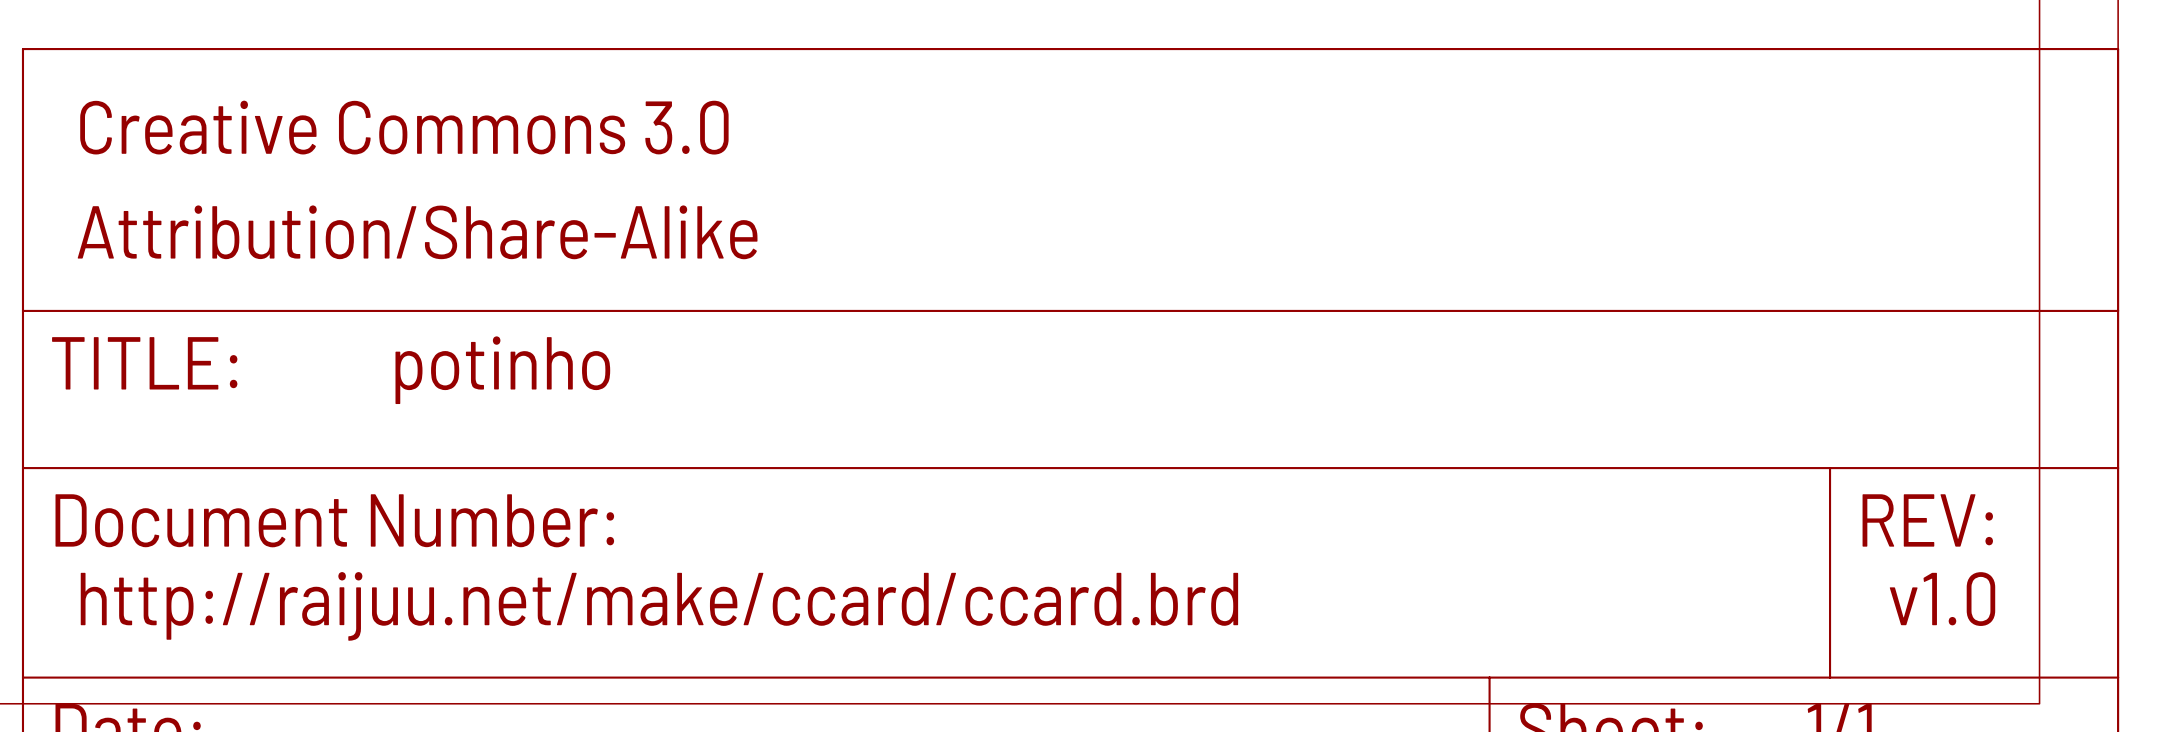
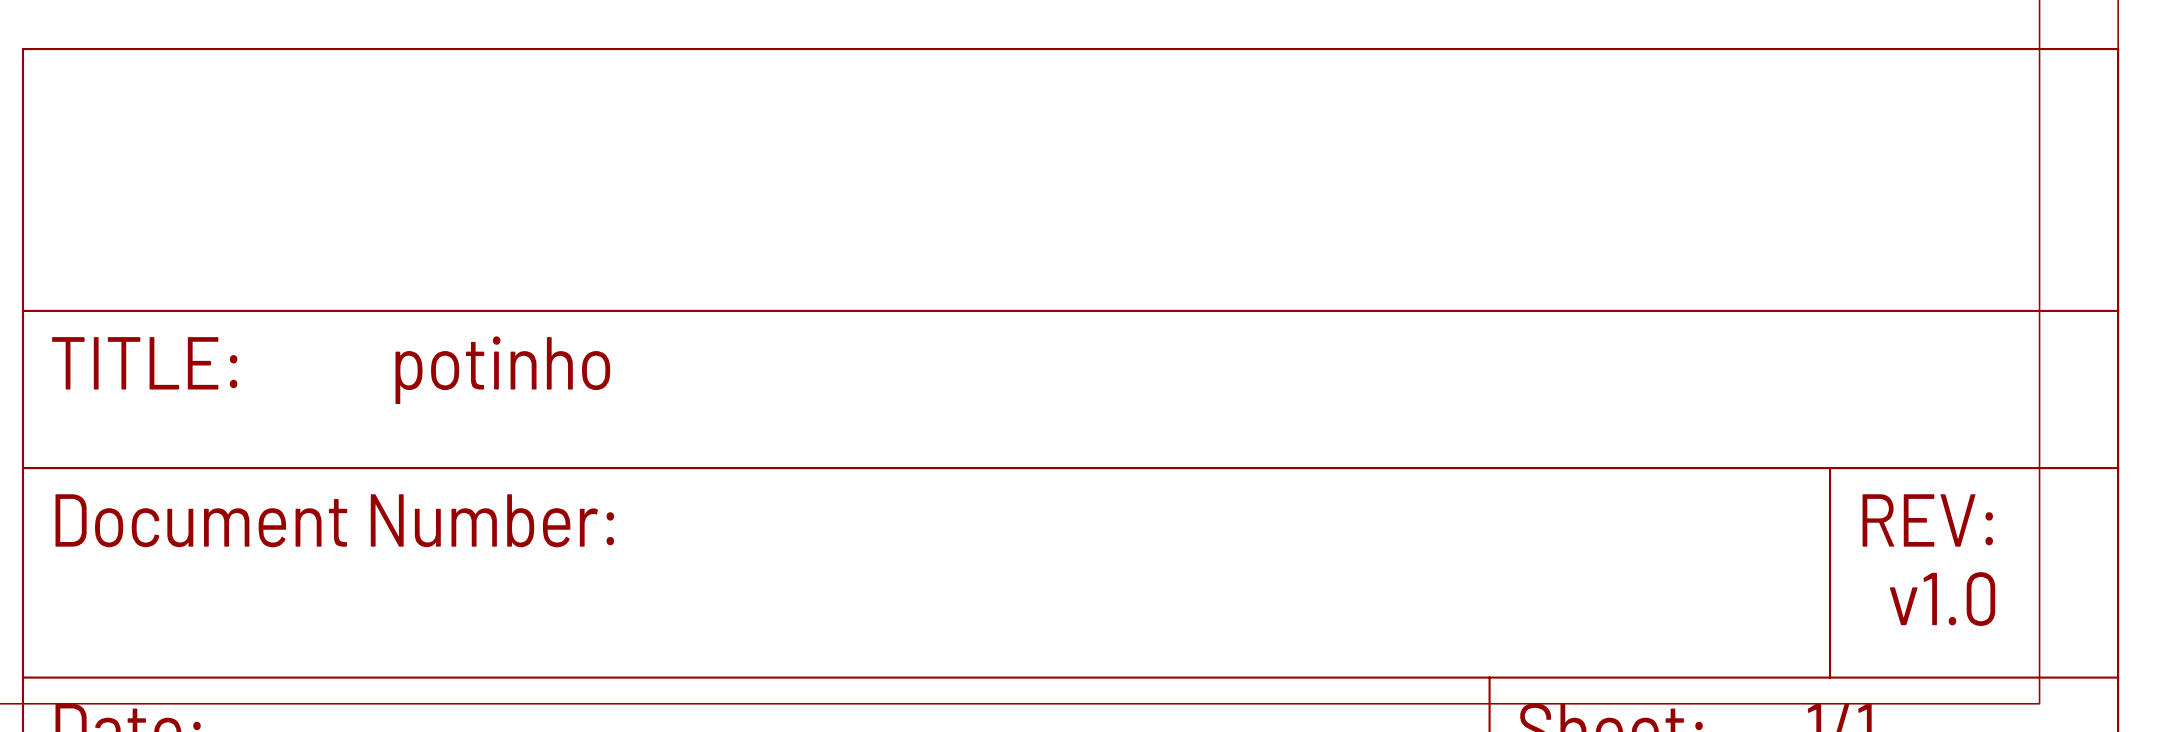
text: Creative Commons 3.0 (404, 127) -> none
text: Attribution/Share-Alike (417, 232) -> none
text: http://raijuu.net/make/ccard/ccard.brd (659, 606) -> none

